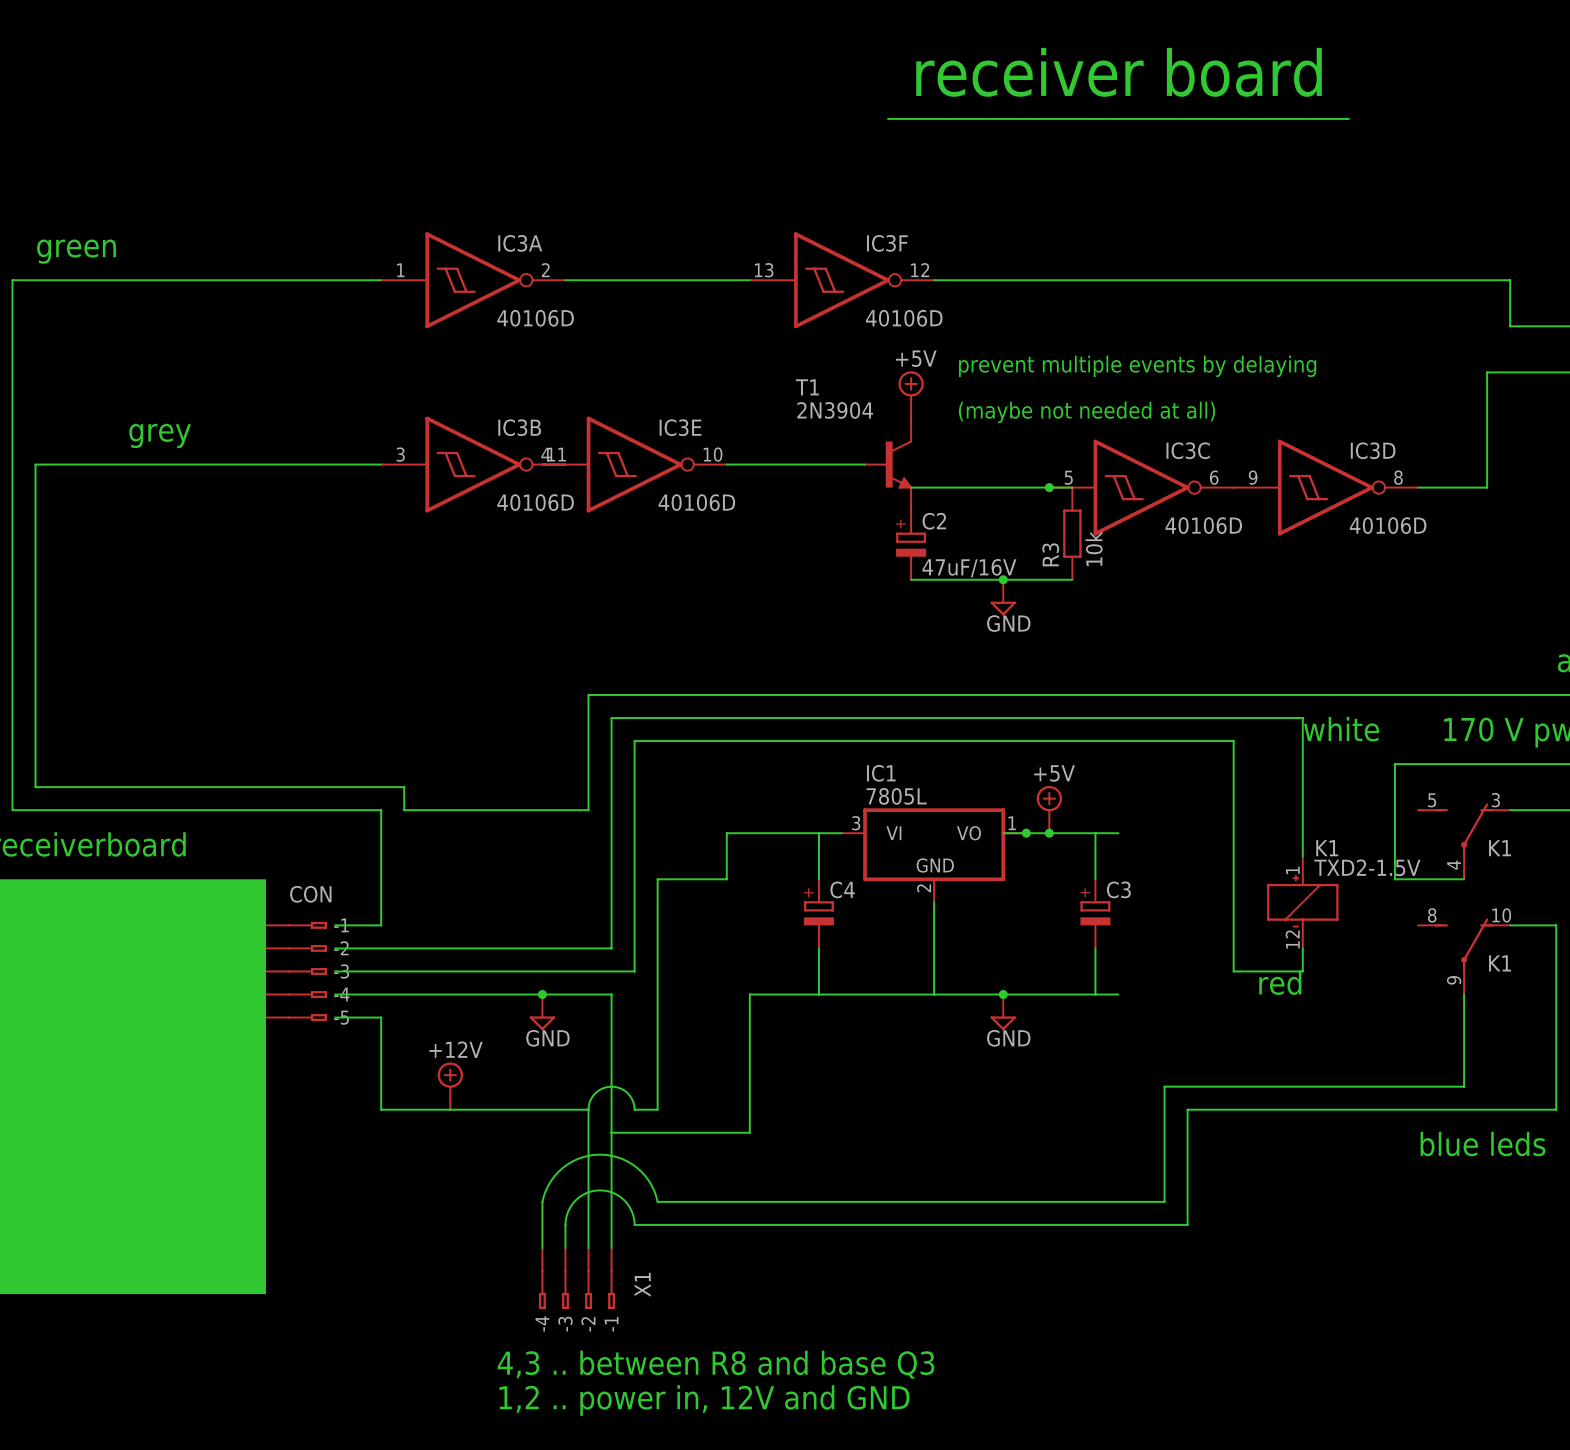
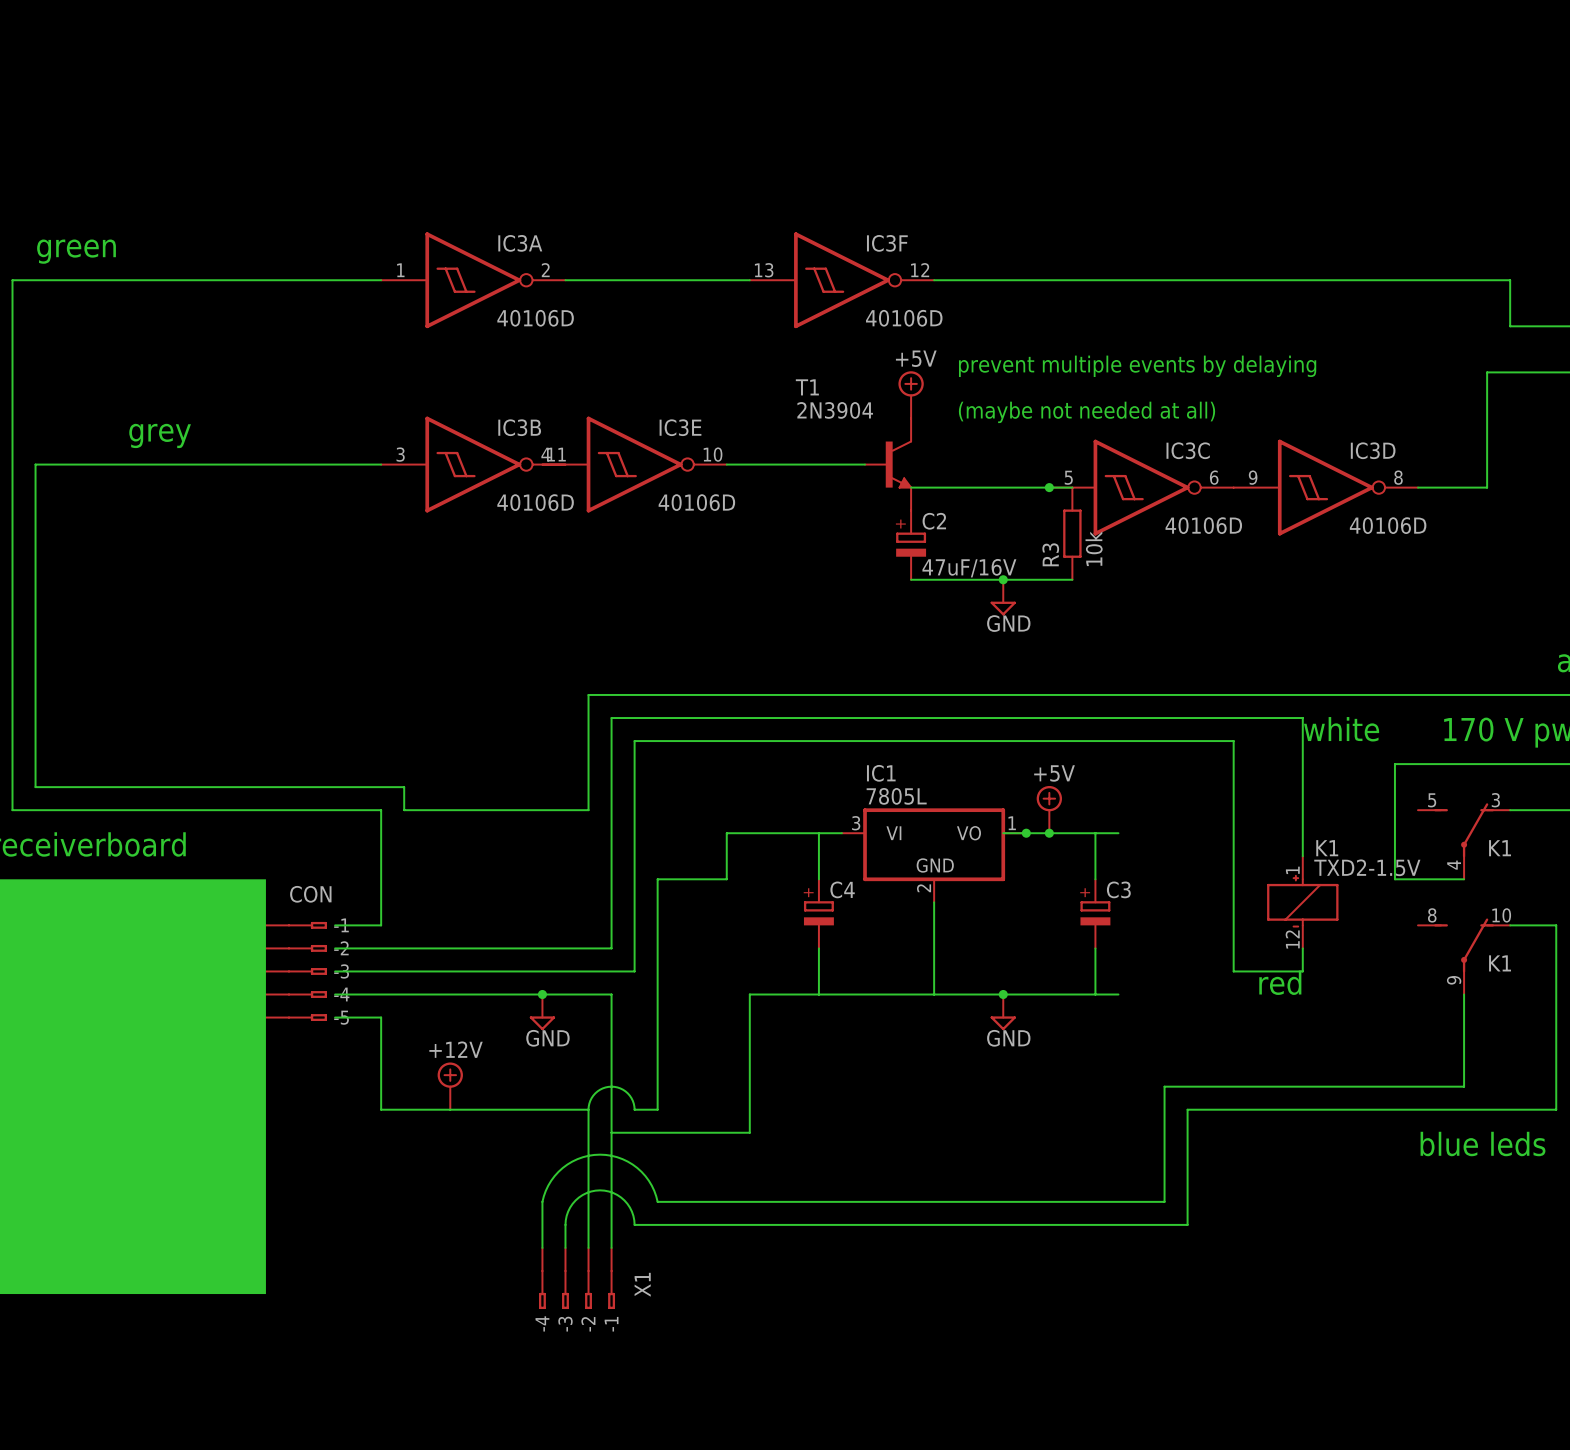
text: receiver board (1119, 72) -> none
wire: (888, 118) (1348, 118) -> none
text: 4,3 .. between R8 and base Q3 (716, 1364) -> none
text: 1,2 .. power in, 12V and GND (704, 1400) -> none

